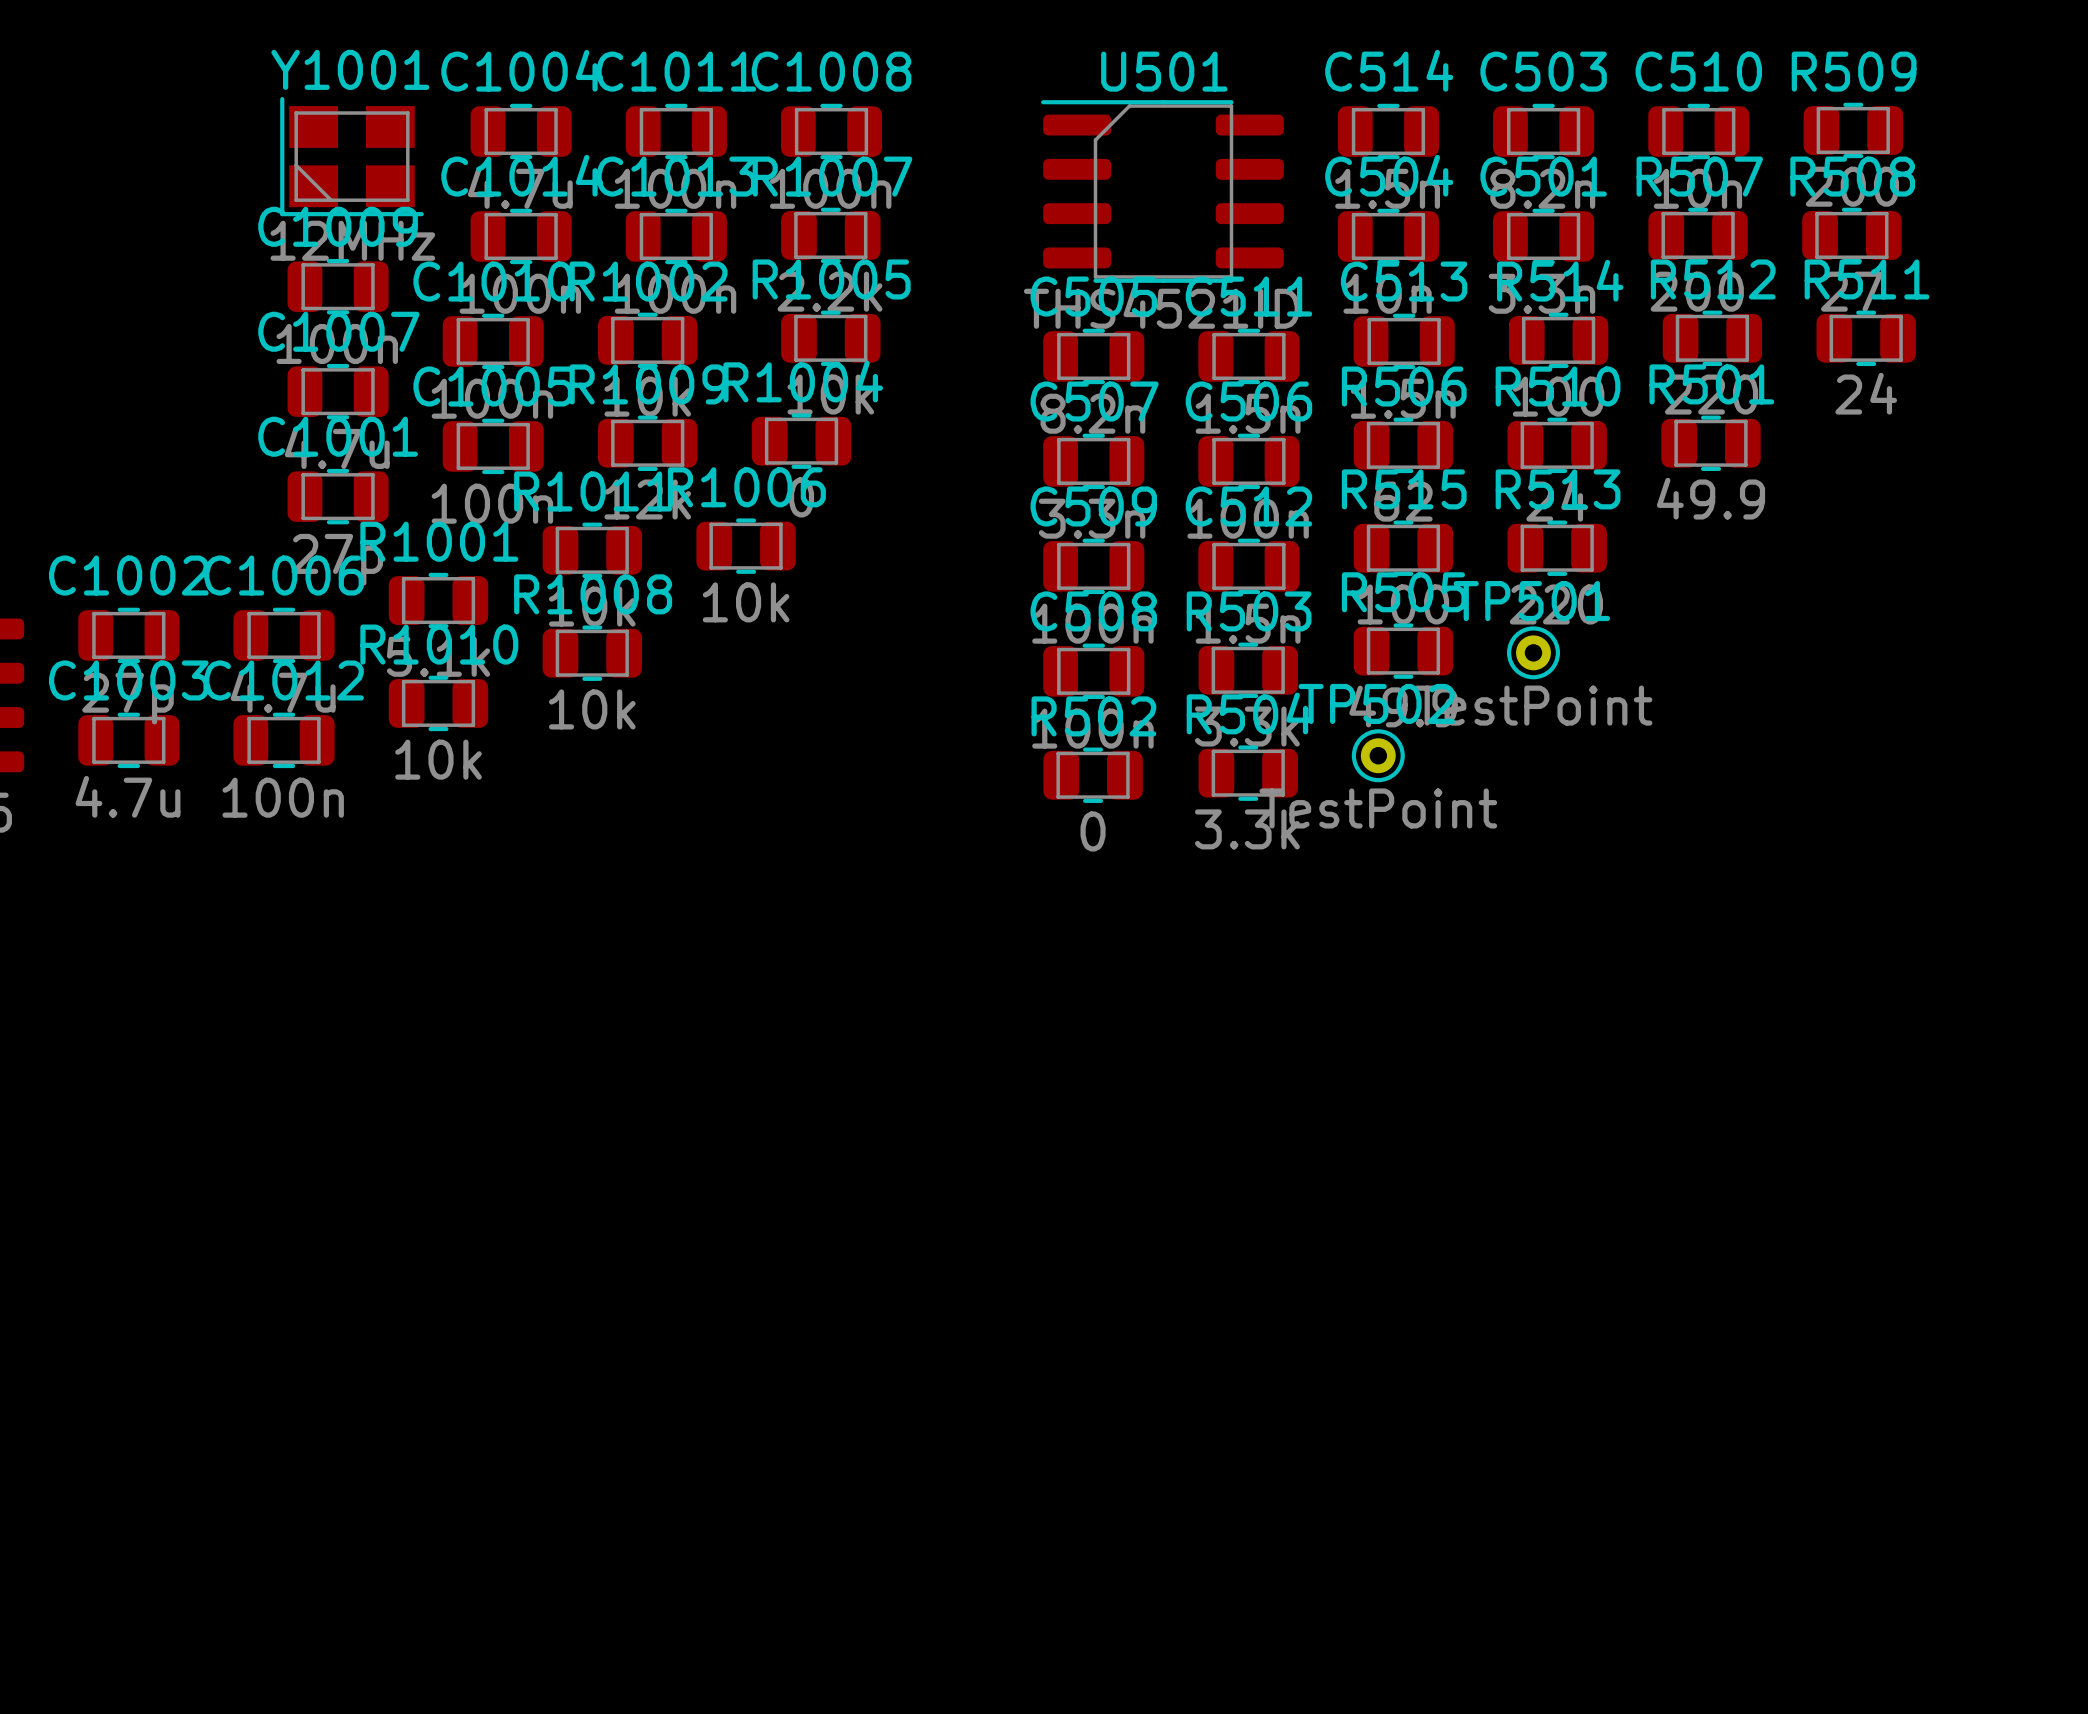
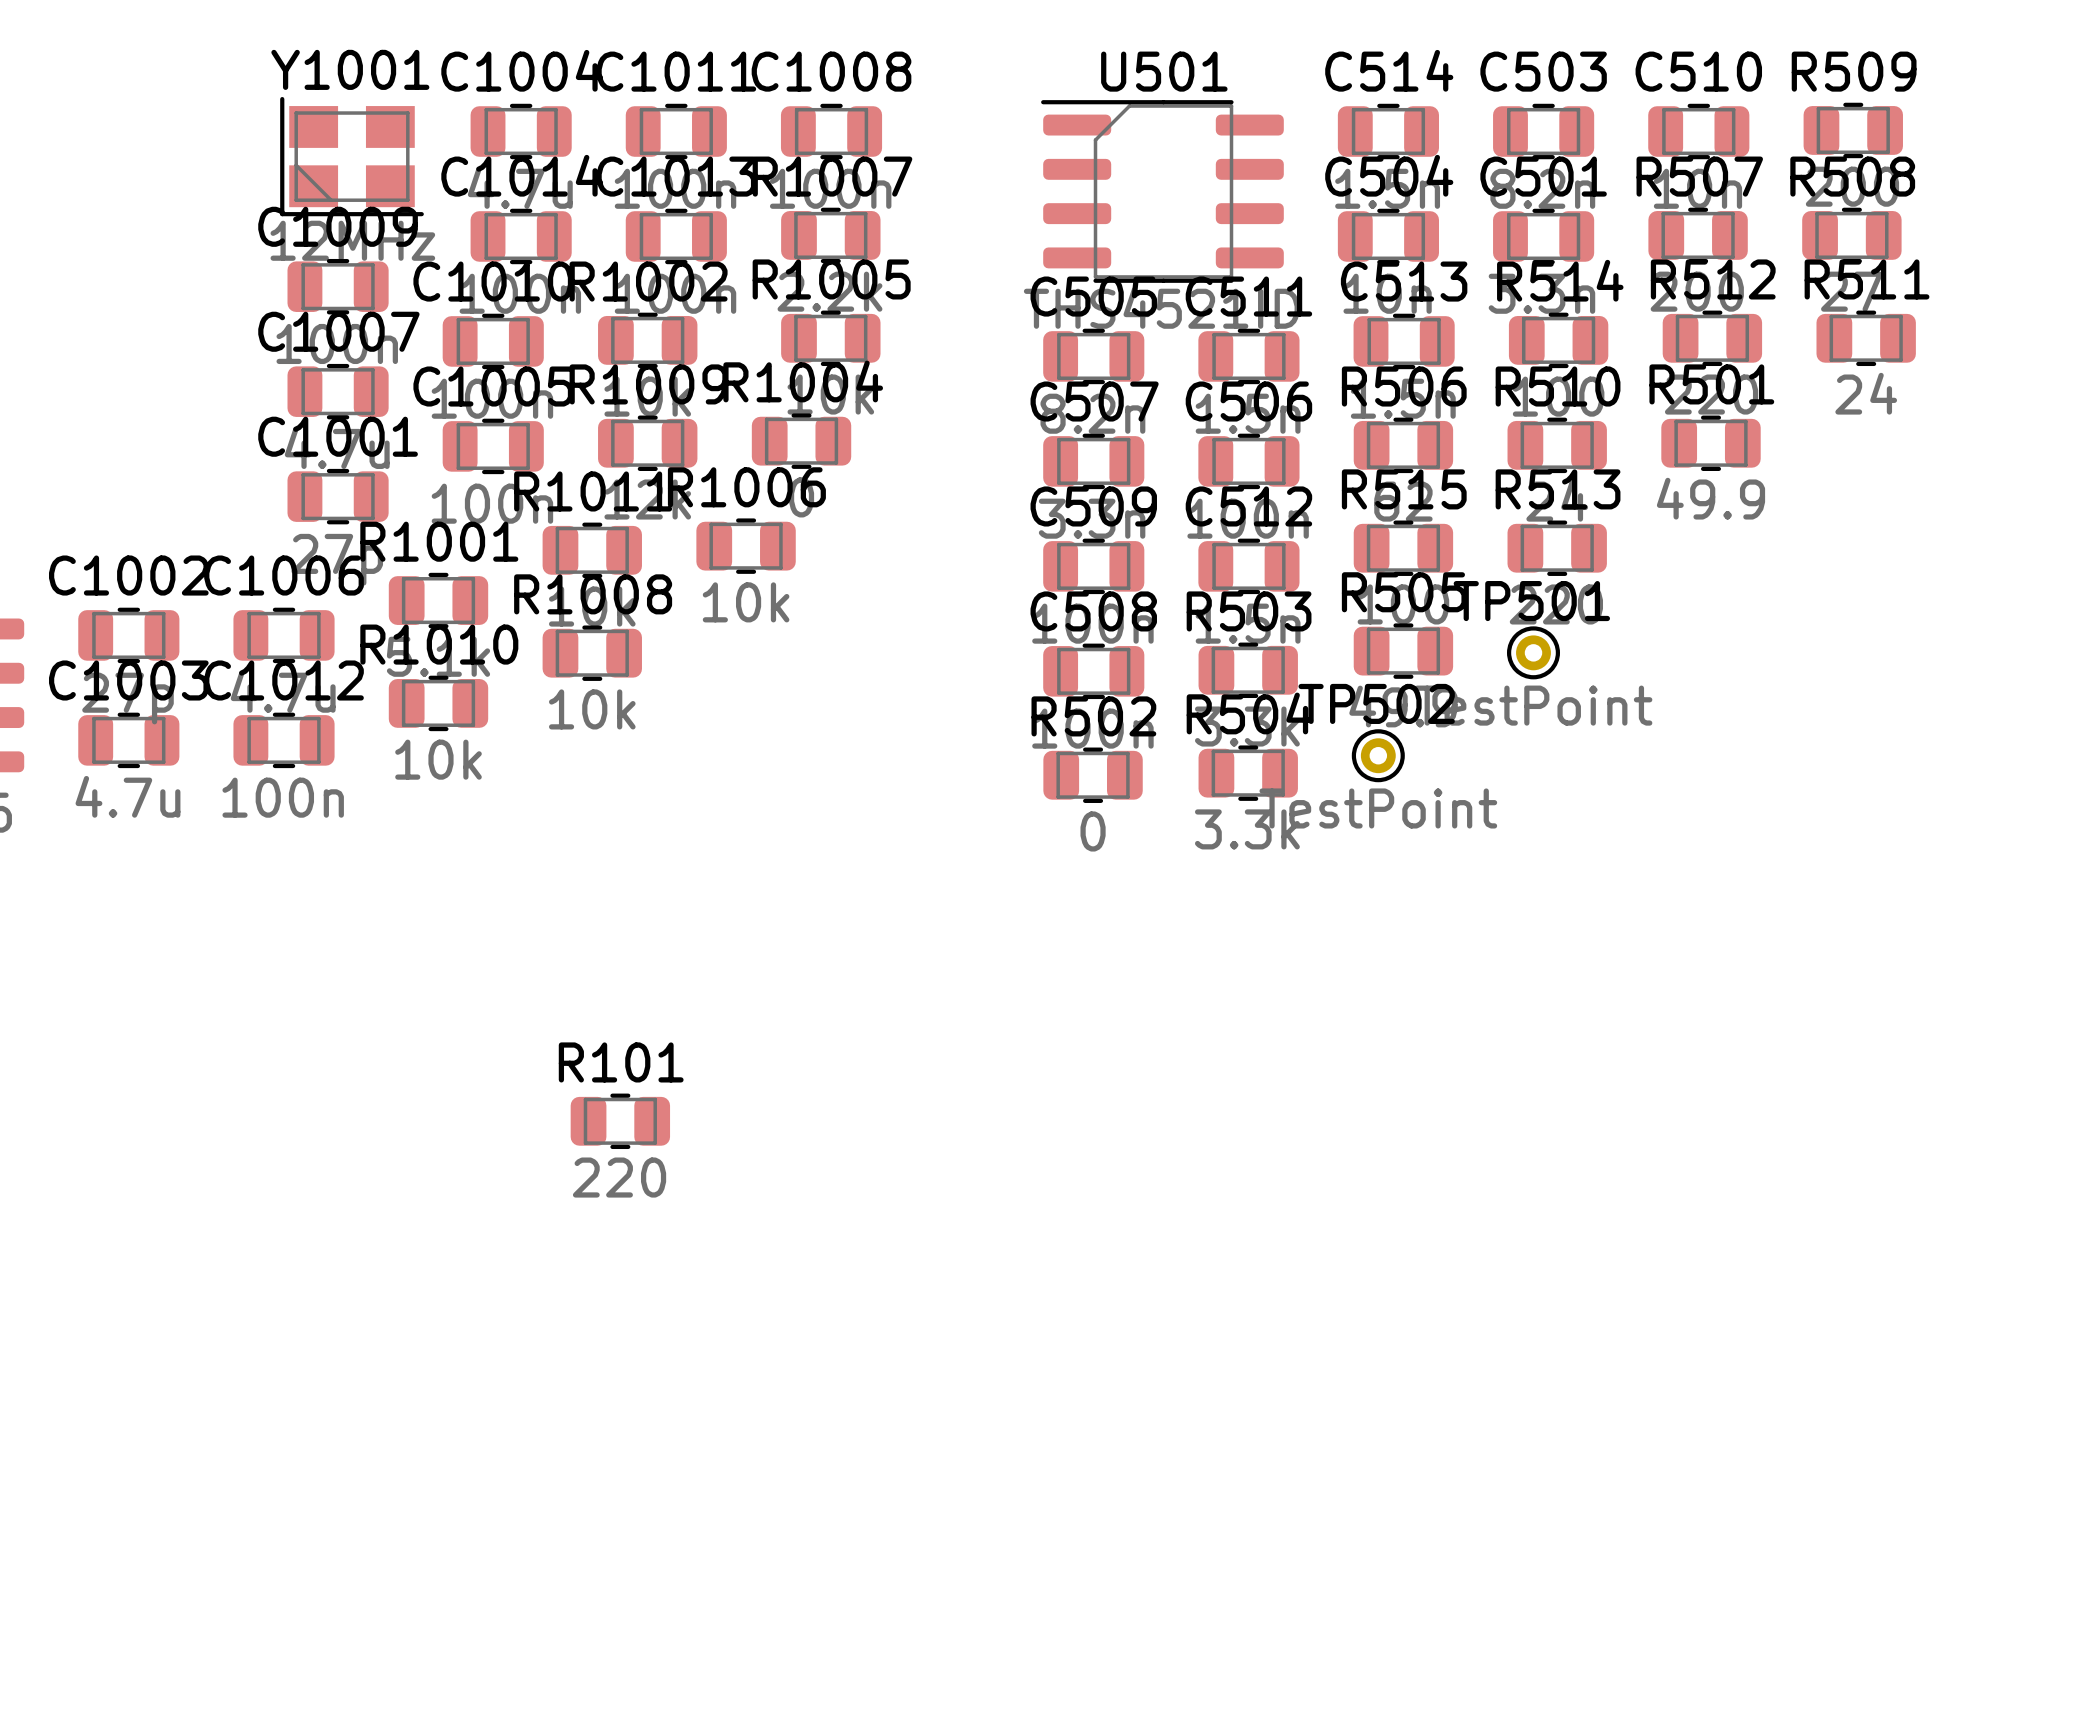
R101: none -> 220 (620, 1121)

